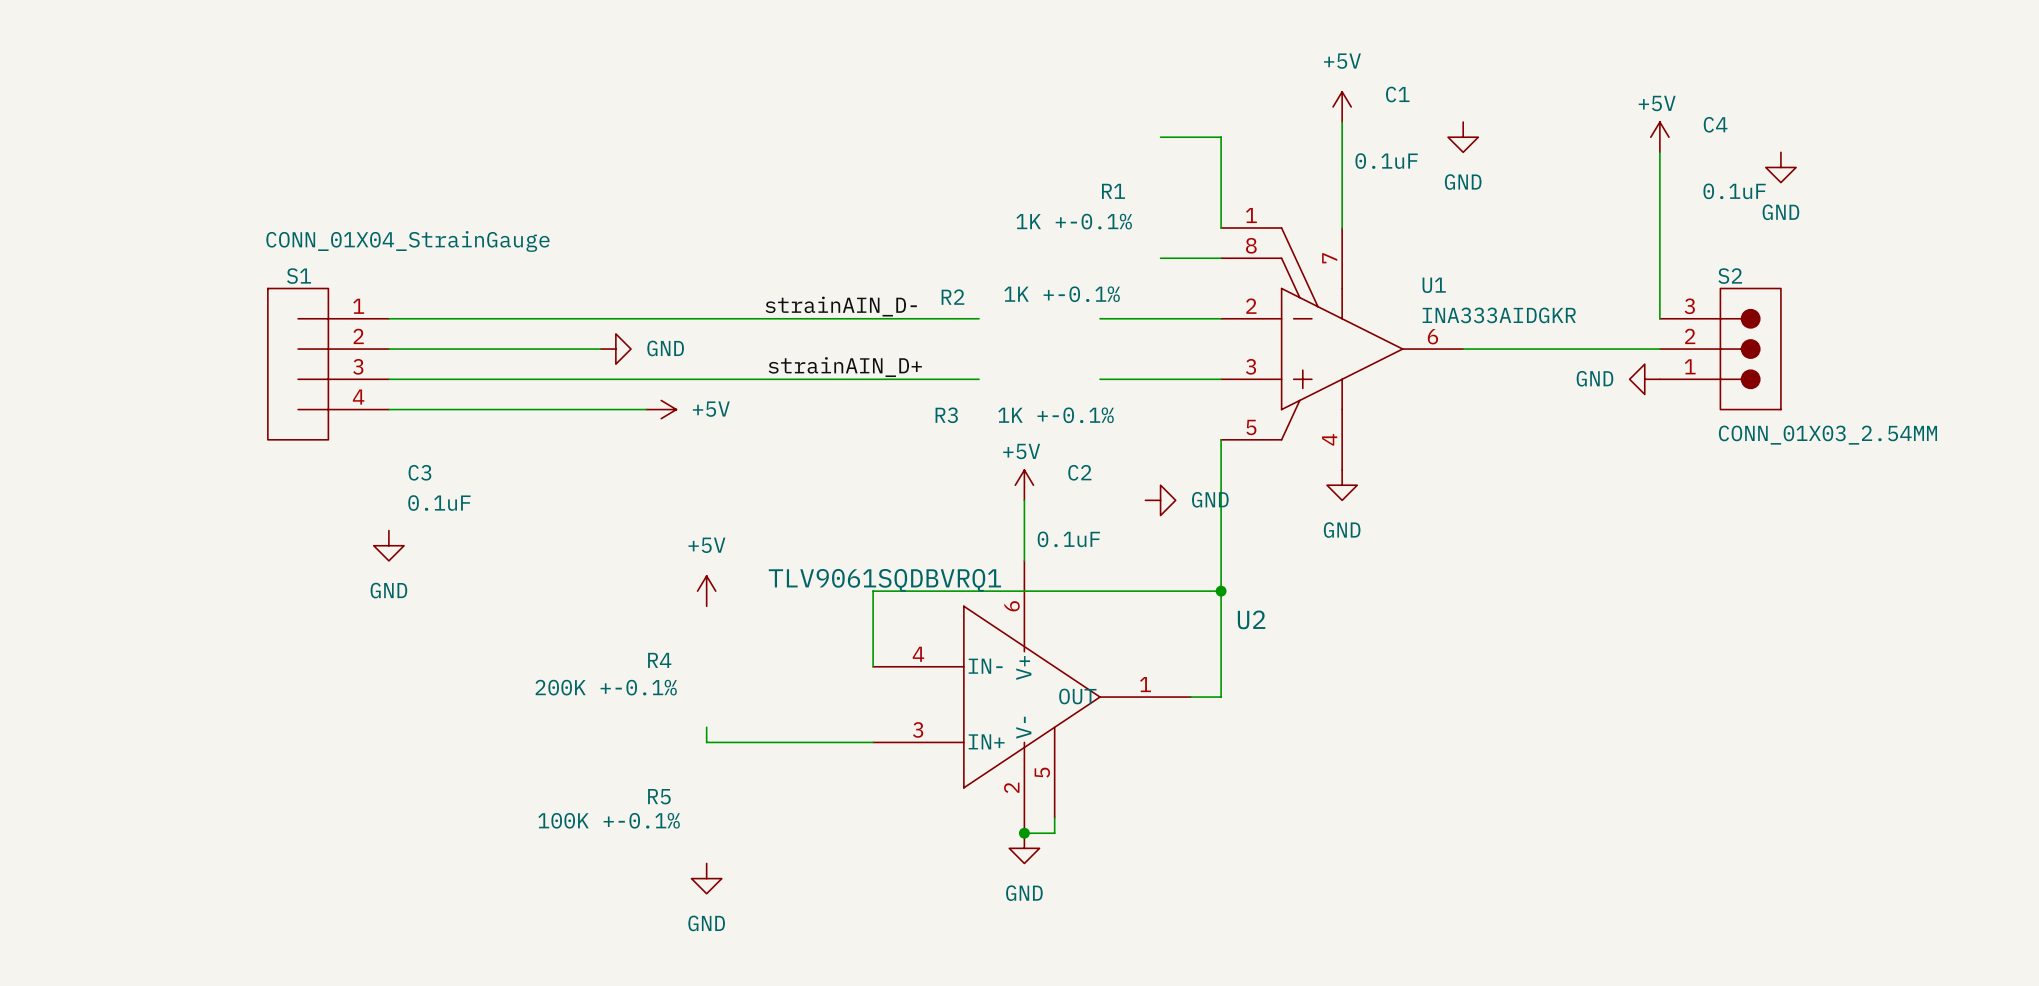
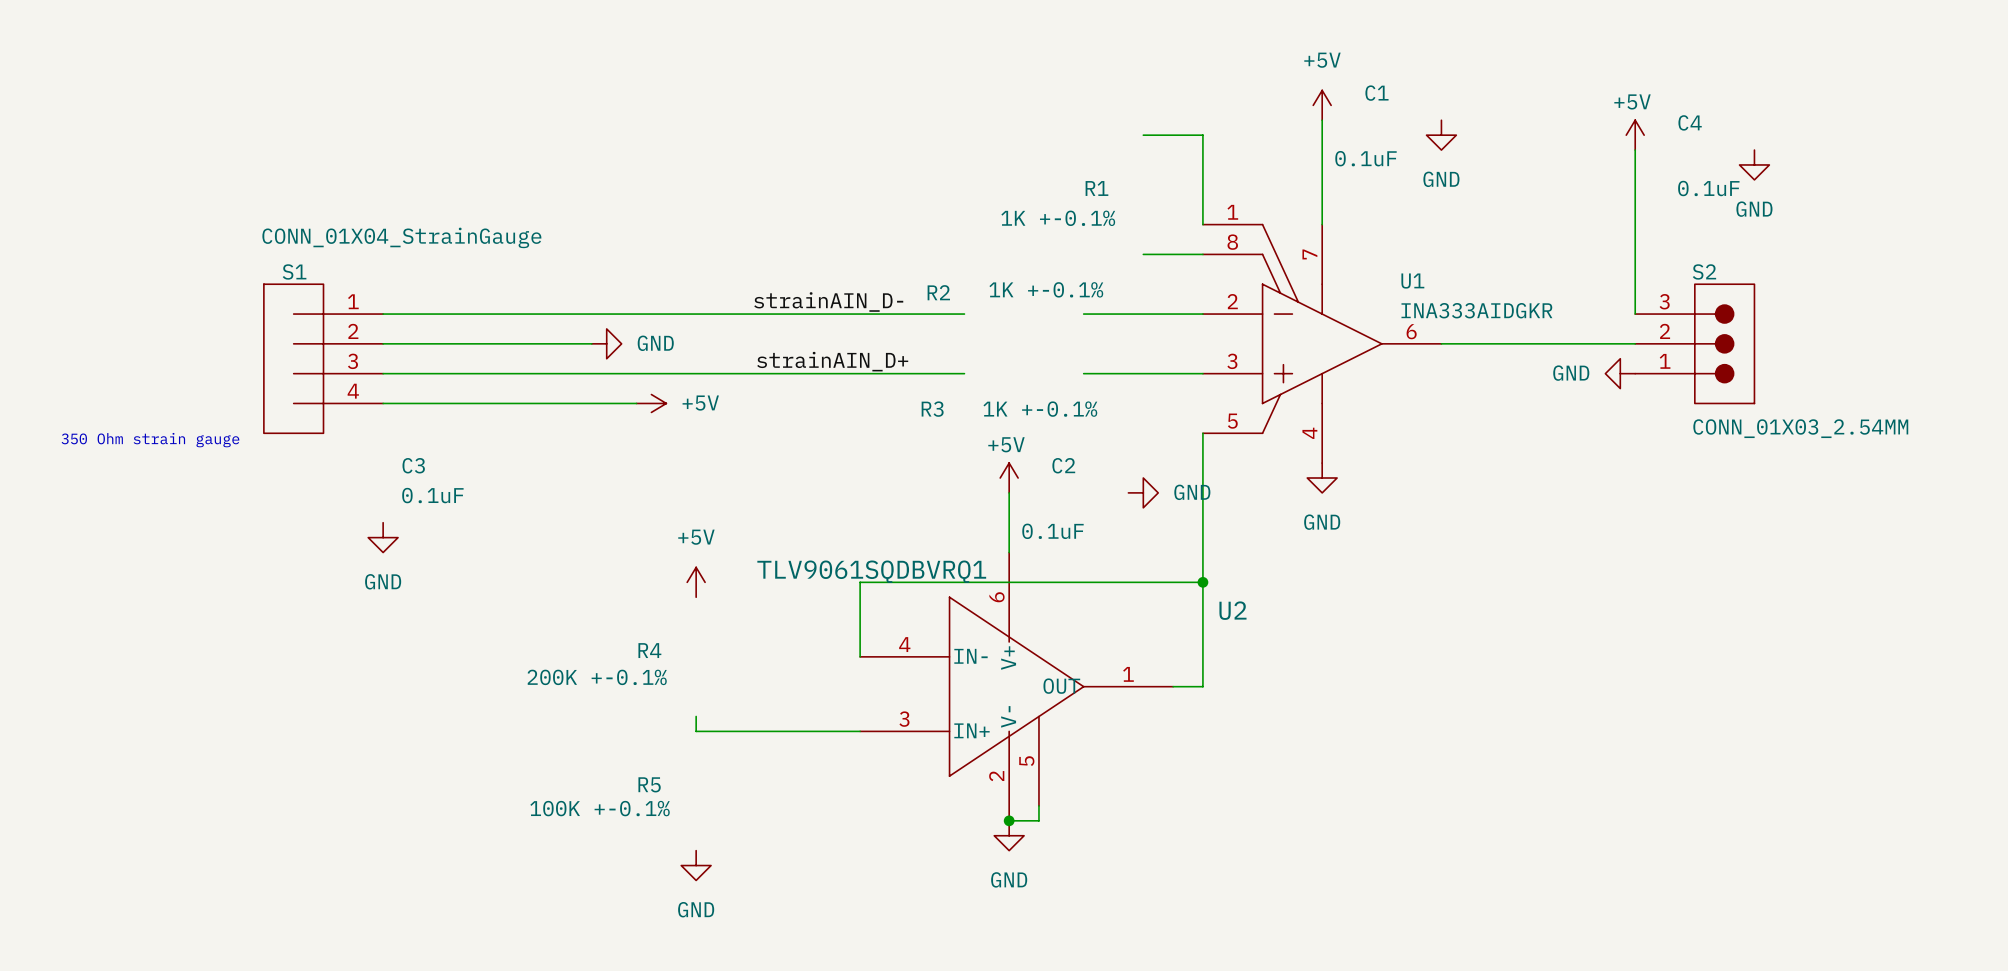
text: none -> 350 Ohm strain gauge (150, 440)

